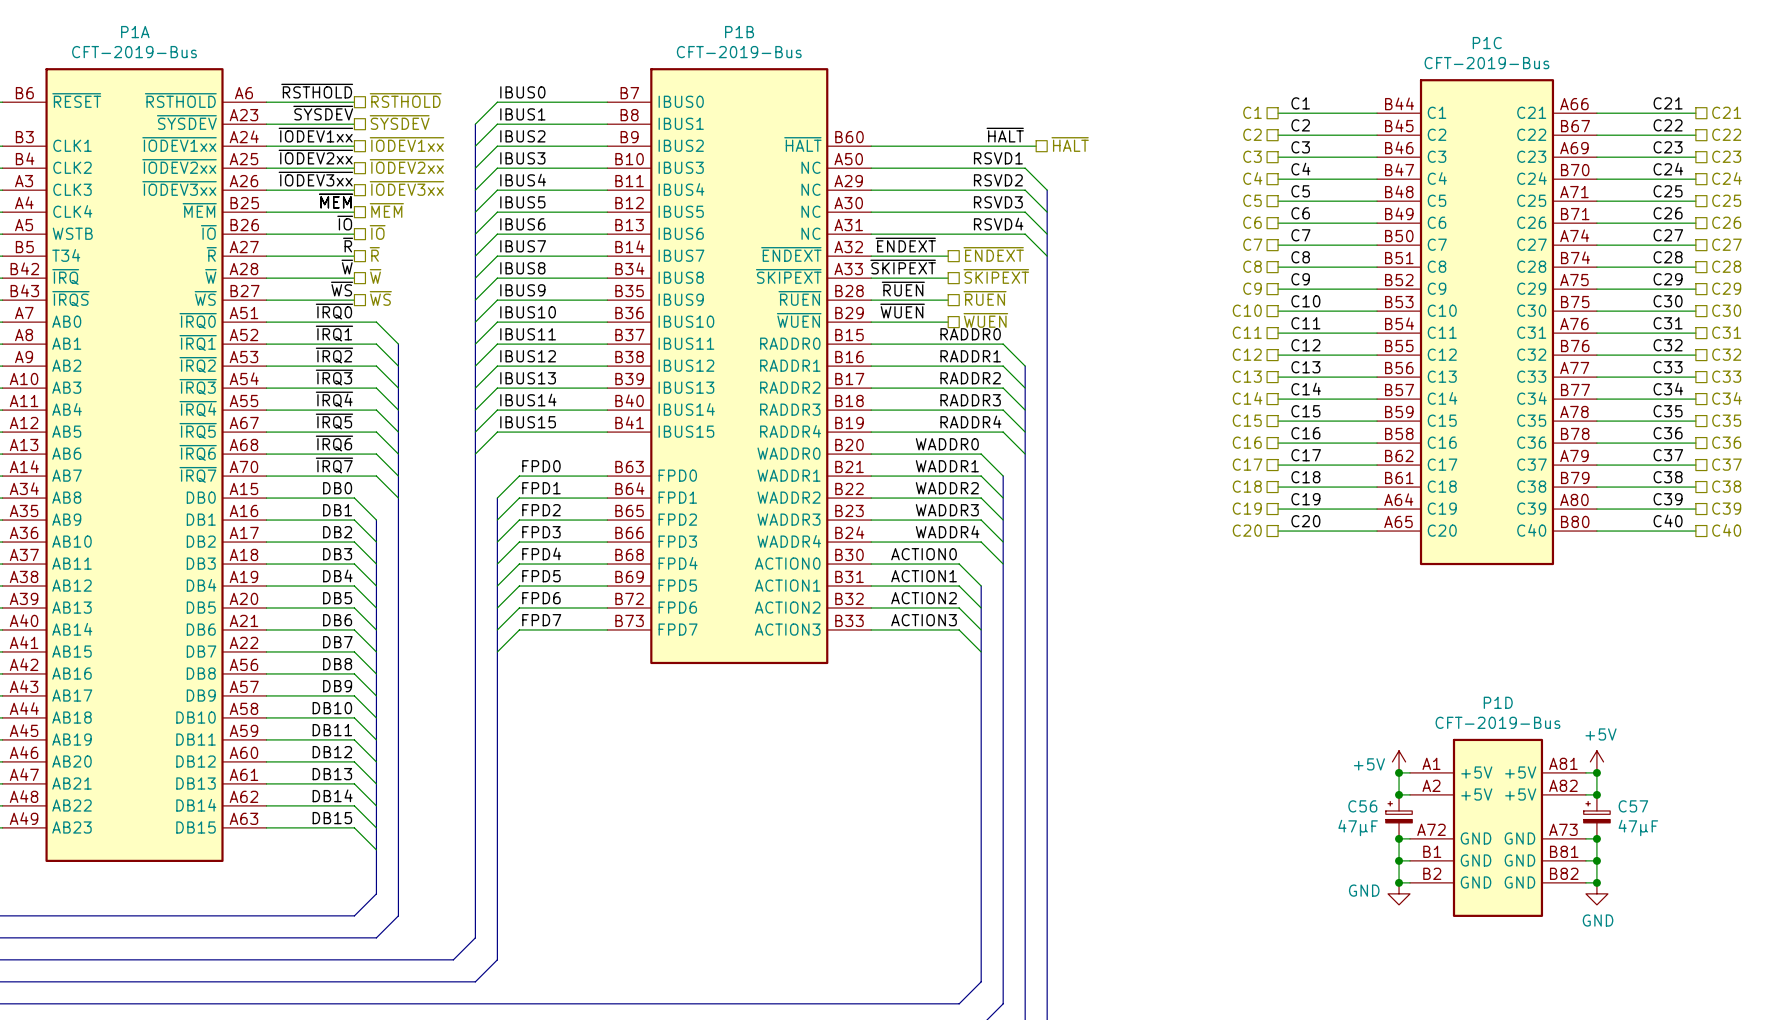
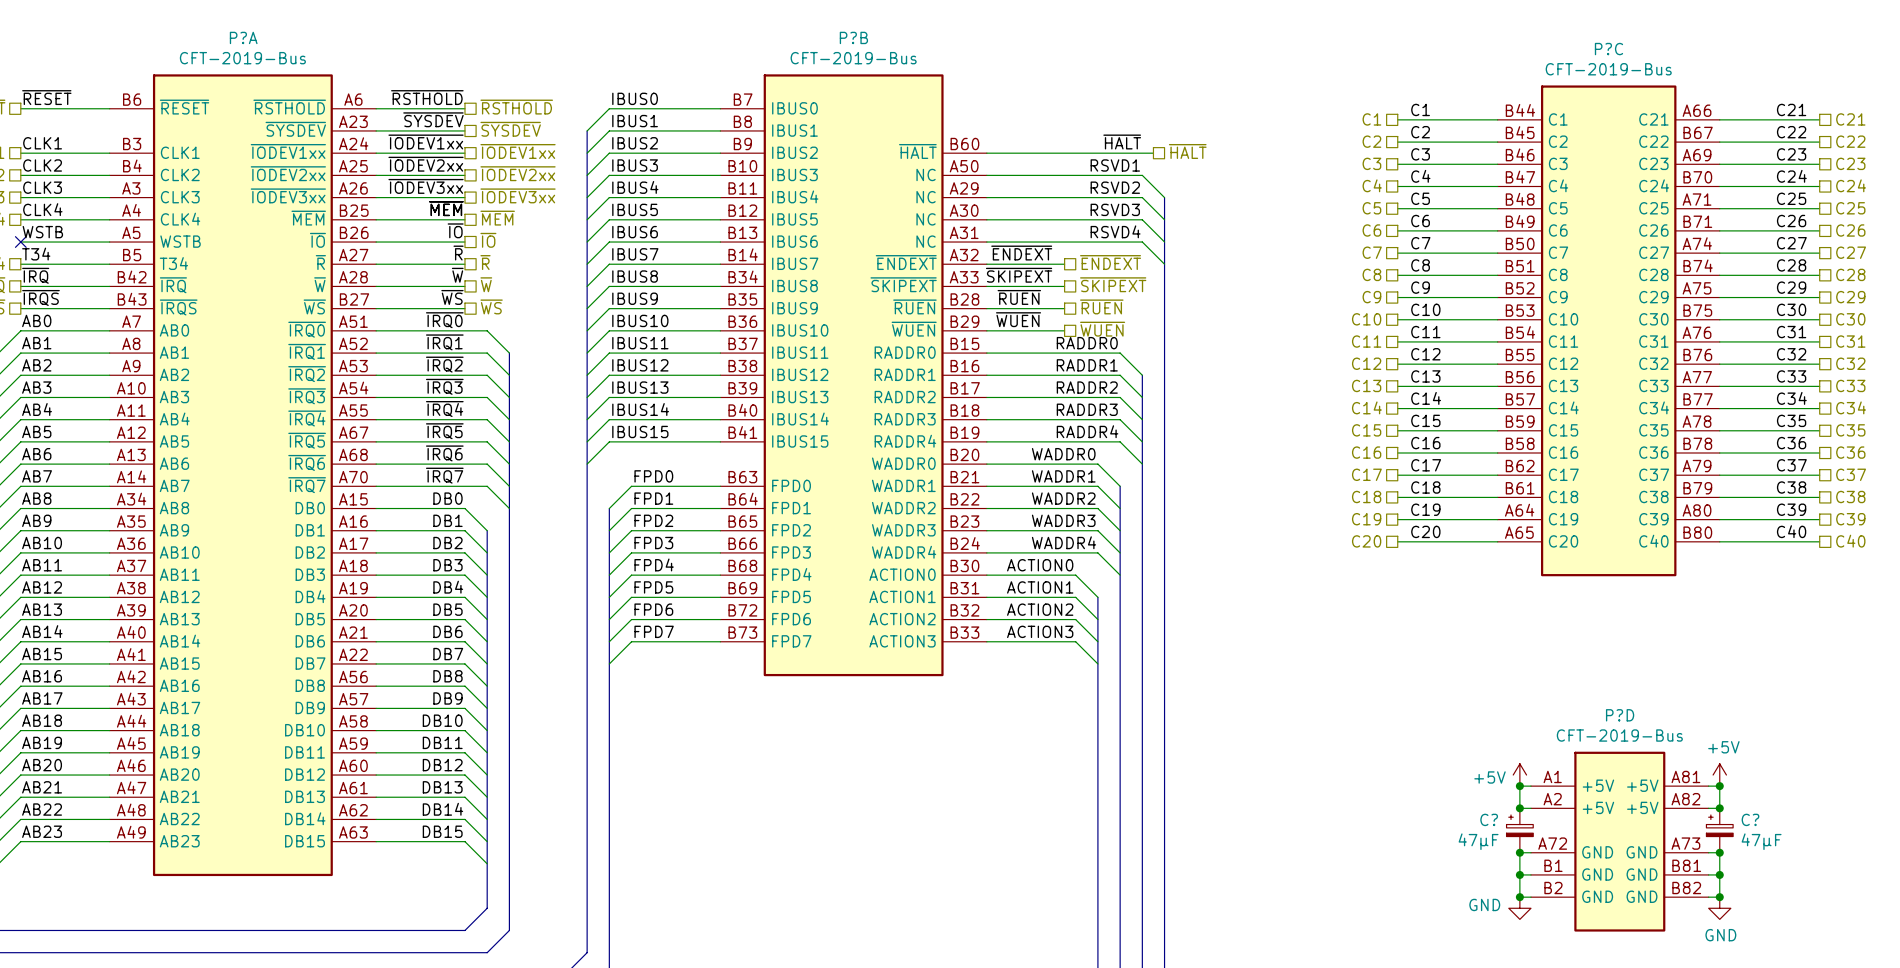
P1A name: P1A (135, 32) -> P?A (243, 37)
P1B name: P1B (739, 32) -> P?B (853, 37)
P1C name: P1C (1487, 43) -> P?C (1608, 49)
P1D name: P1D (1498, 702) -> P?D (1620, 715)
C56 name: C56 (1362, 806) -> C? (1489, 819)
C57 name: C57 (1633, 806) -> C? (1750, 819)

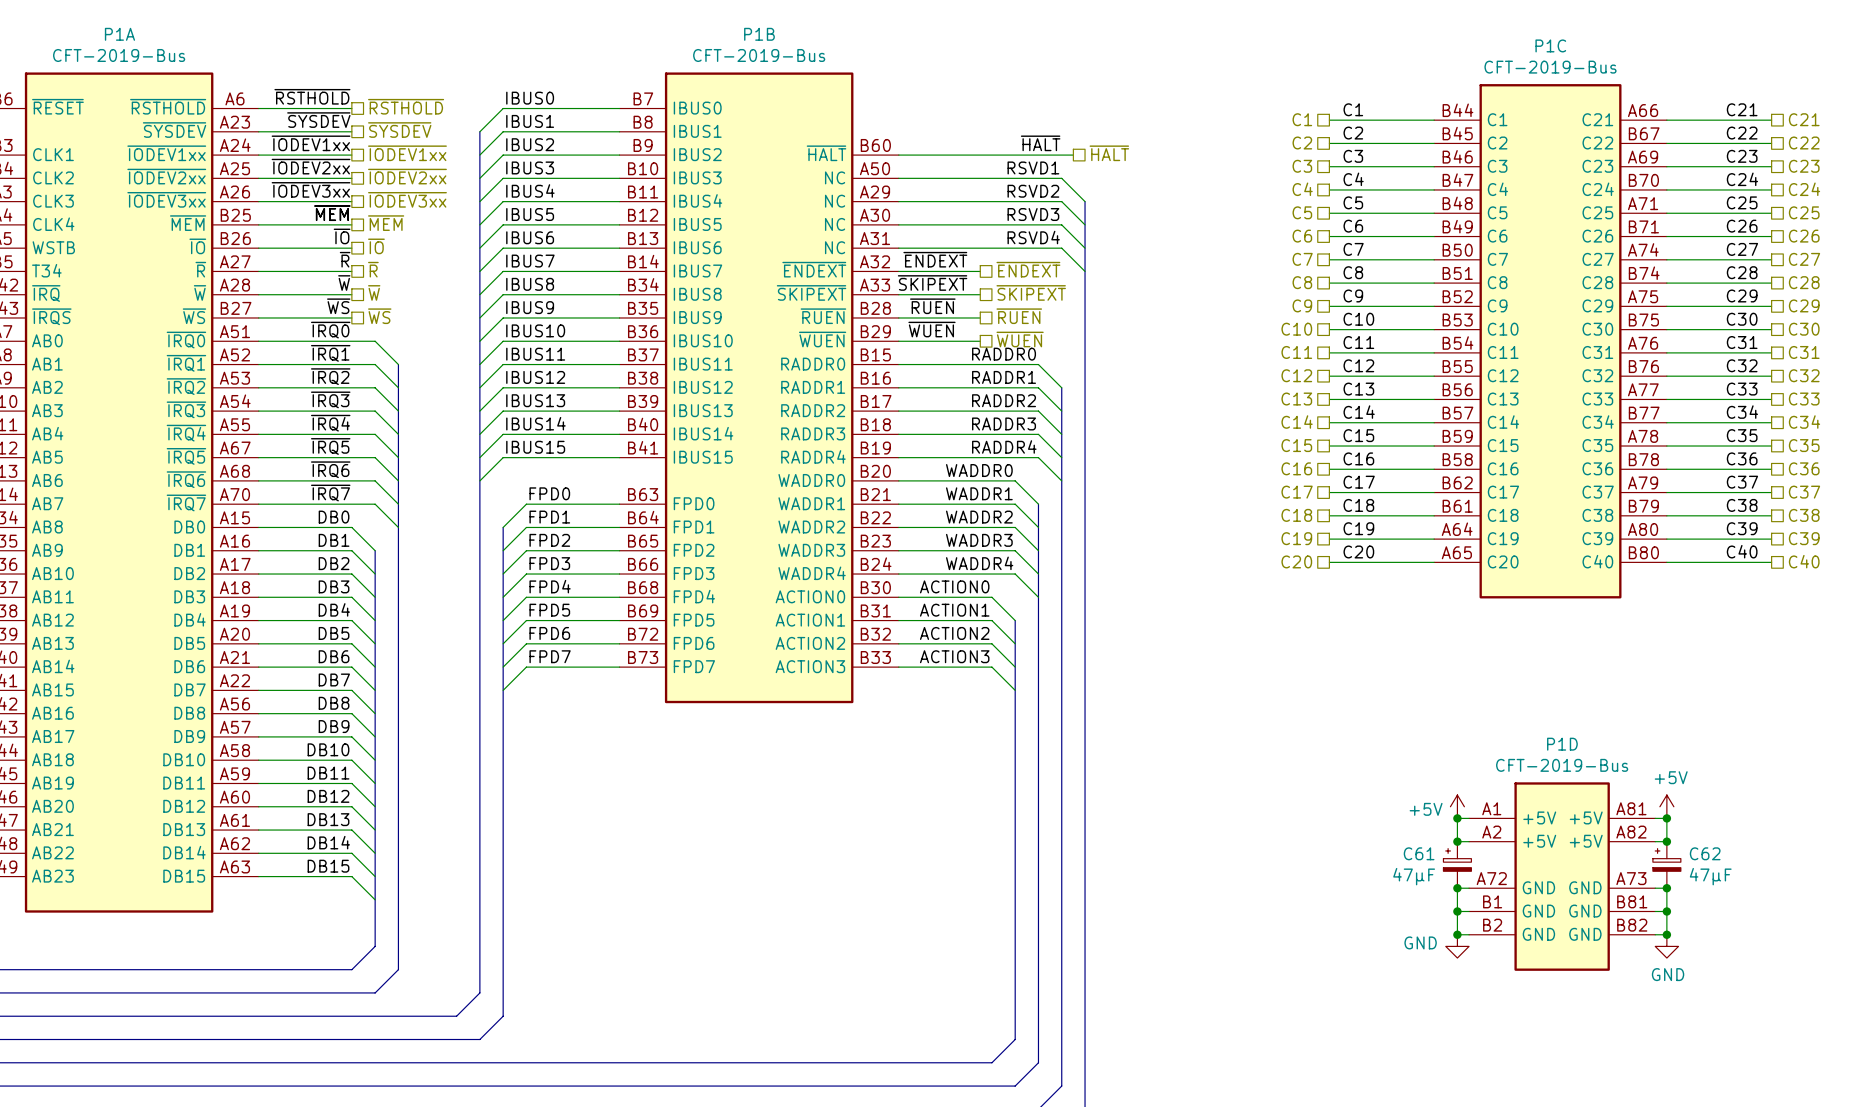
P?A name: P?A (243, 37) -> P1A (119, 34)
P?B name: P?B (853, 37) -> P1B (759, 34)
P?C name: P?C (1608, 49) -> P1C (1550, 45)
P?D name: P?D (1620, 715) -> P1D (1562, 744)
C? name: C? (1489, 819) -> C61 (1419, 853)
C? name: C? (1750, 819) -> C62 (1705, 853)

